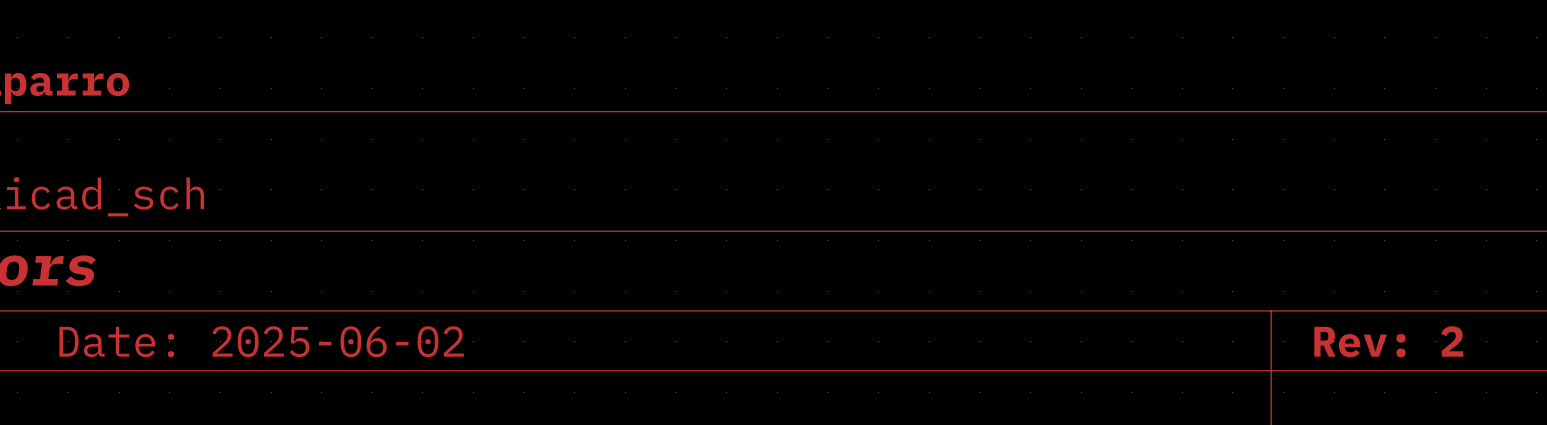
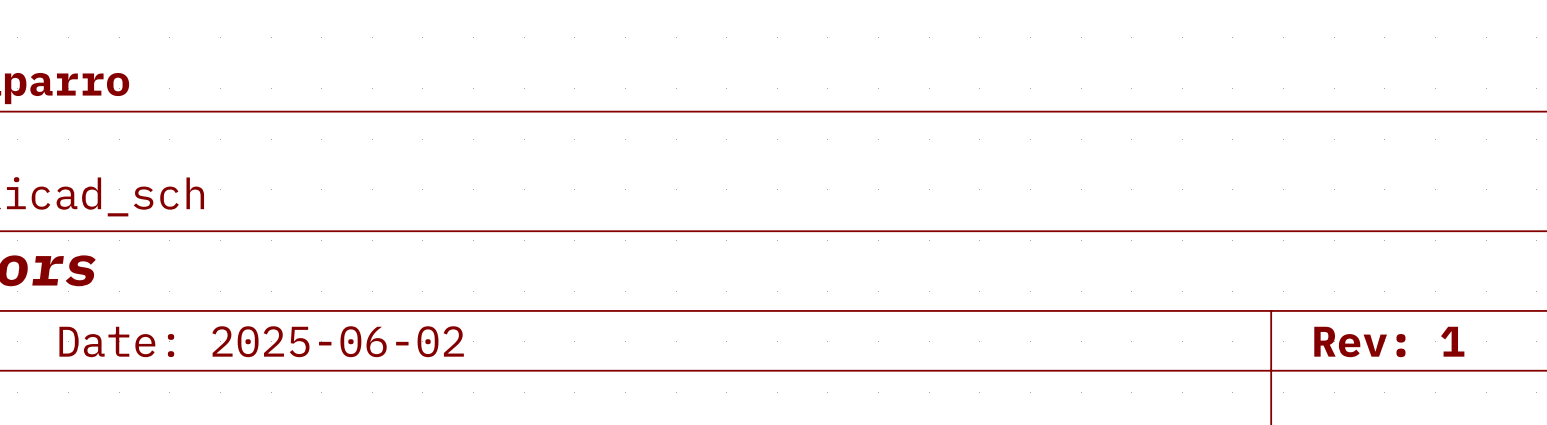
title block: Rev: 2 (1388, 341) -> Rev: 1 (1389, 341)

